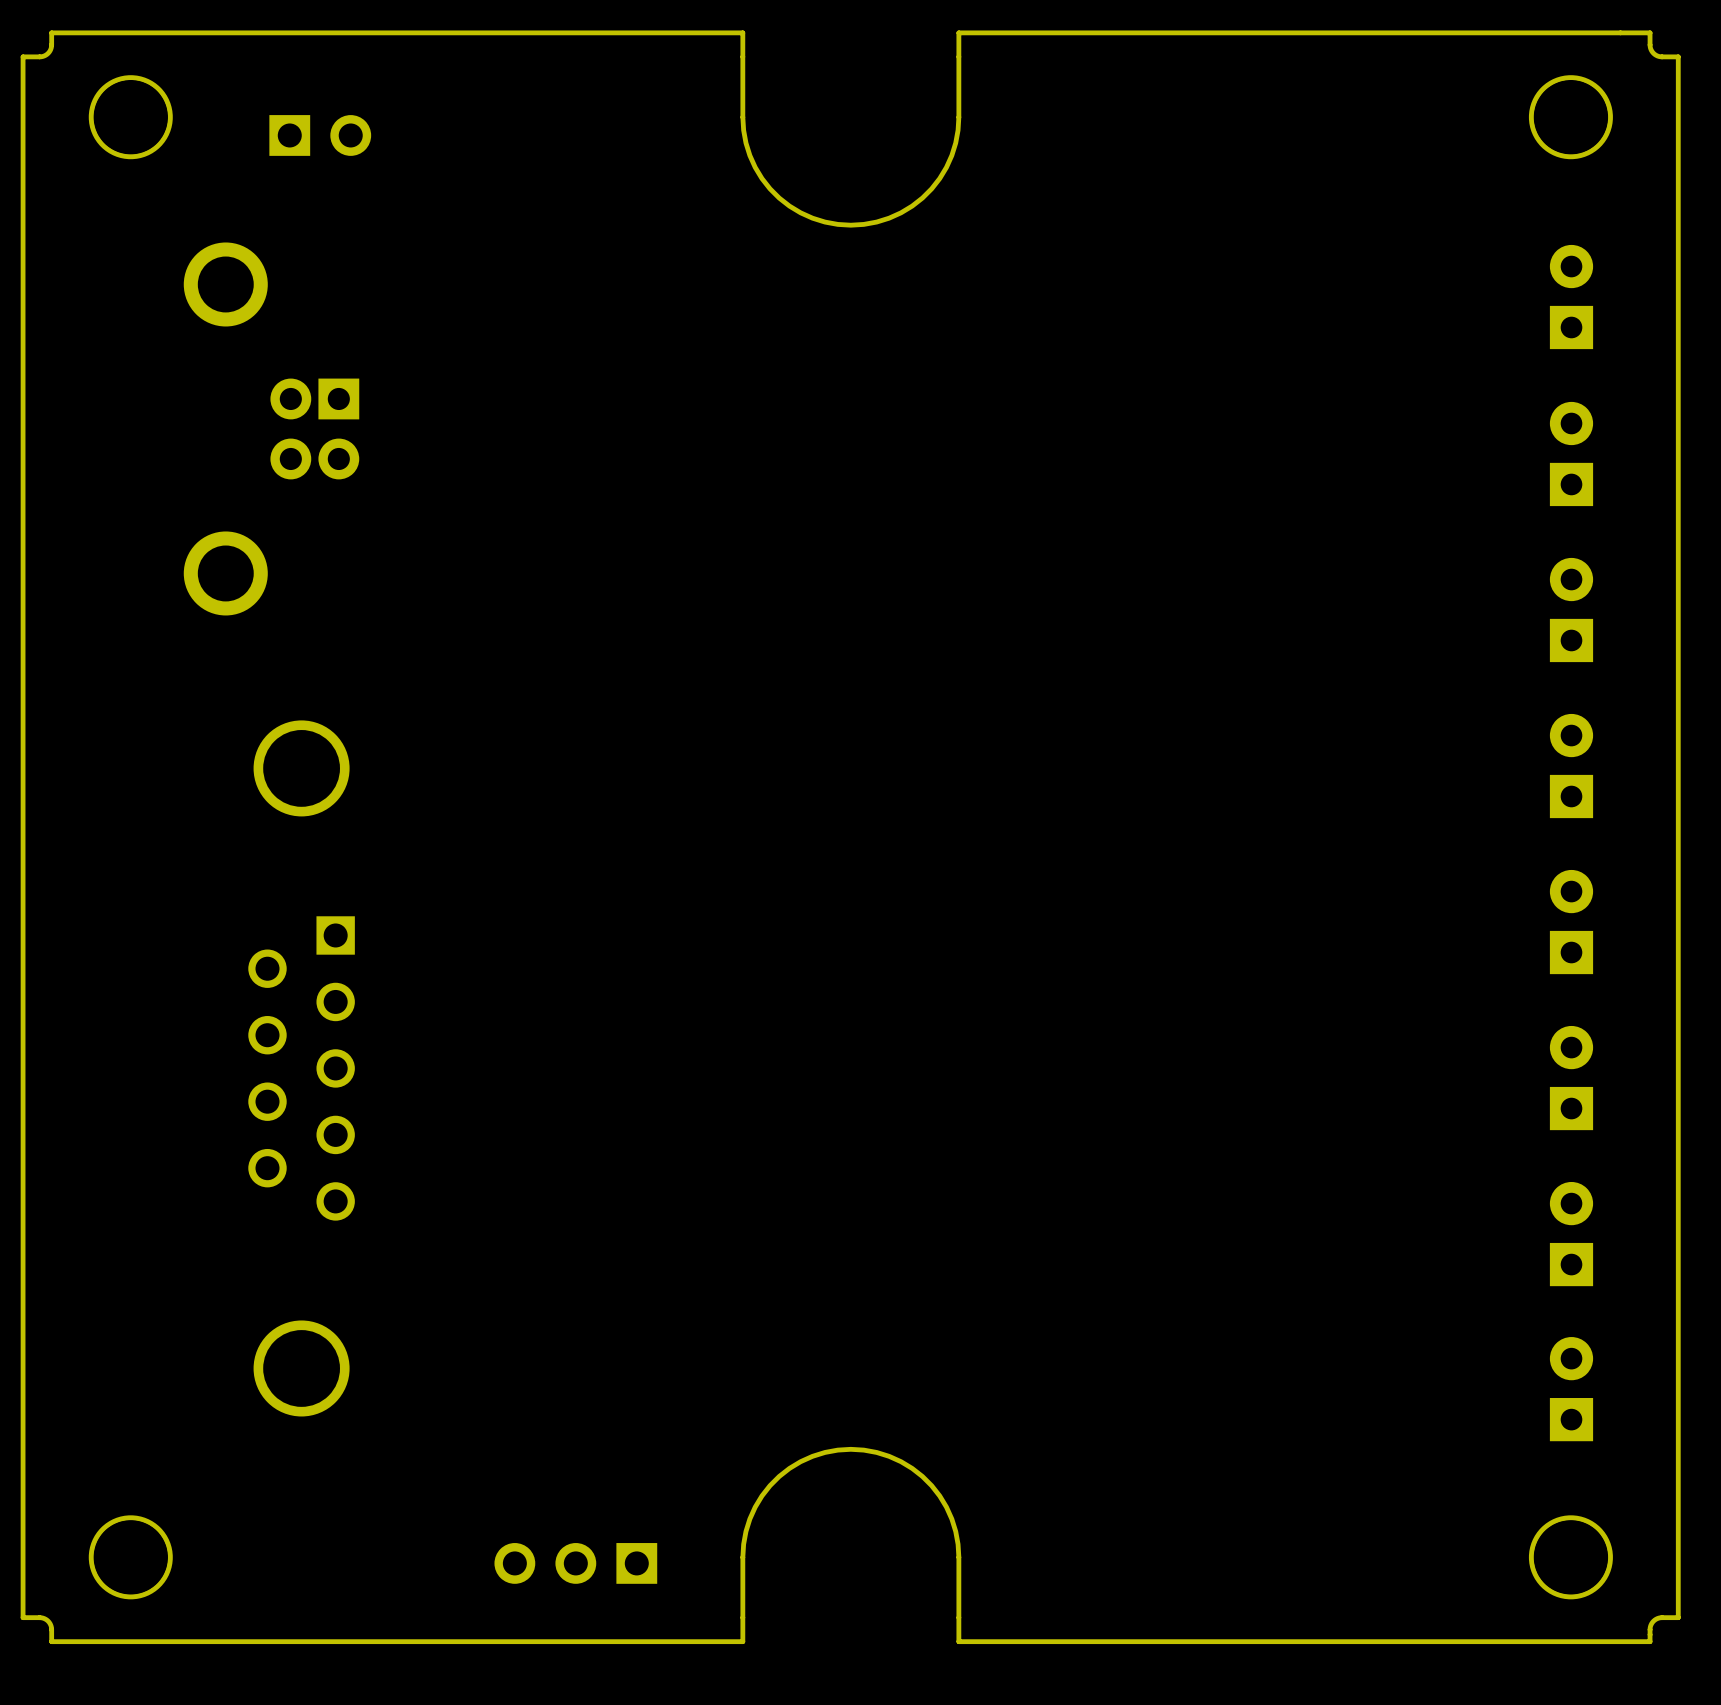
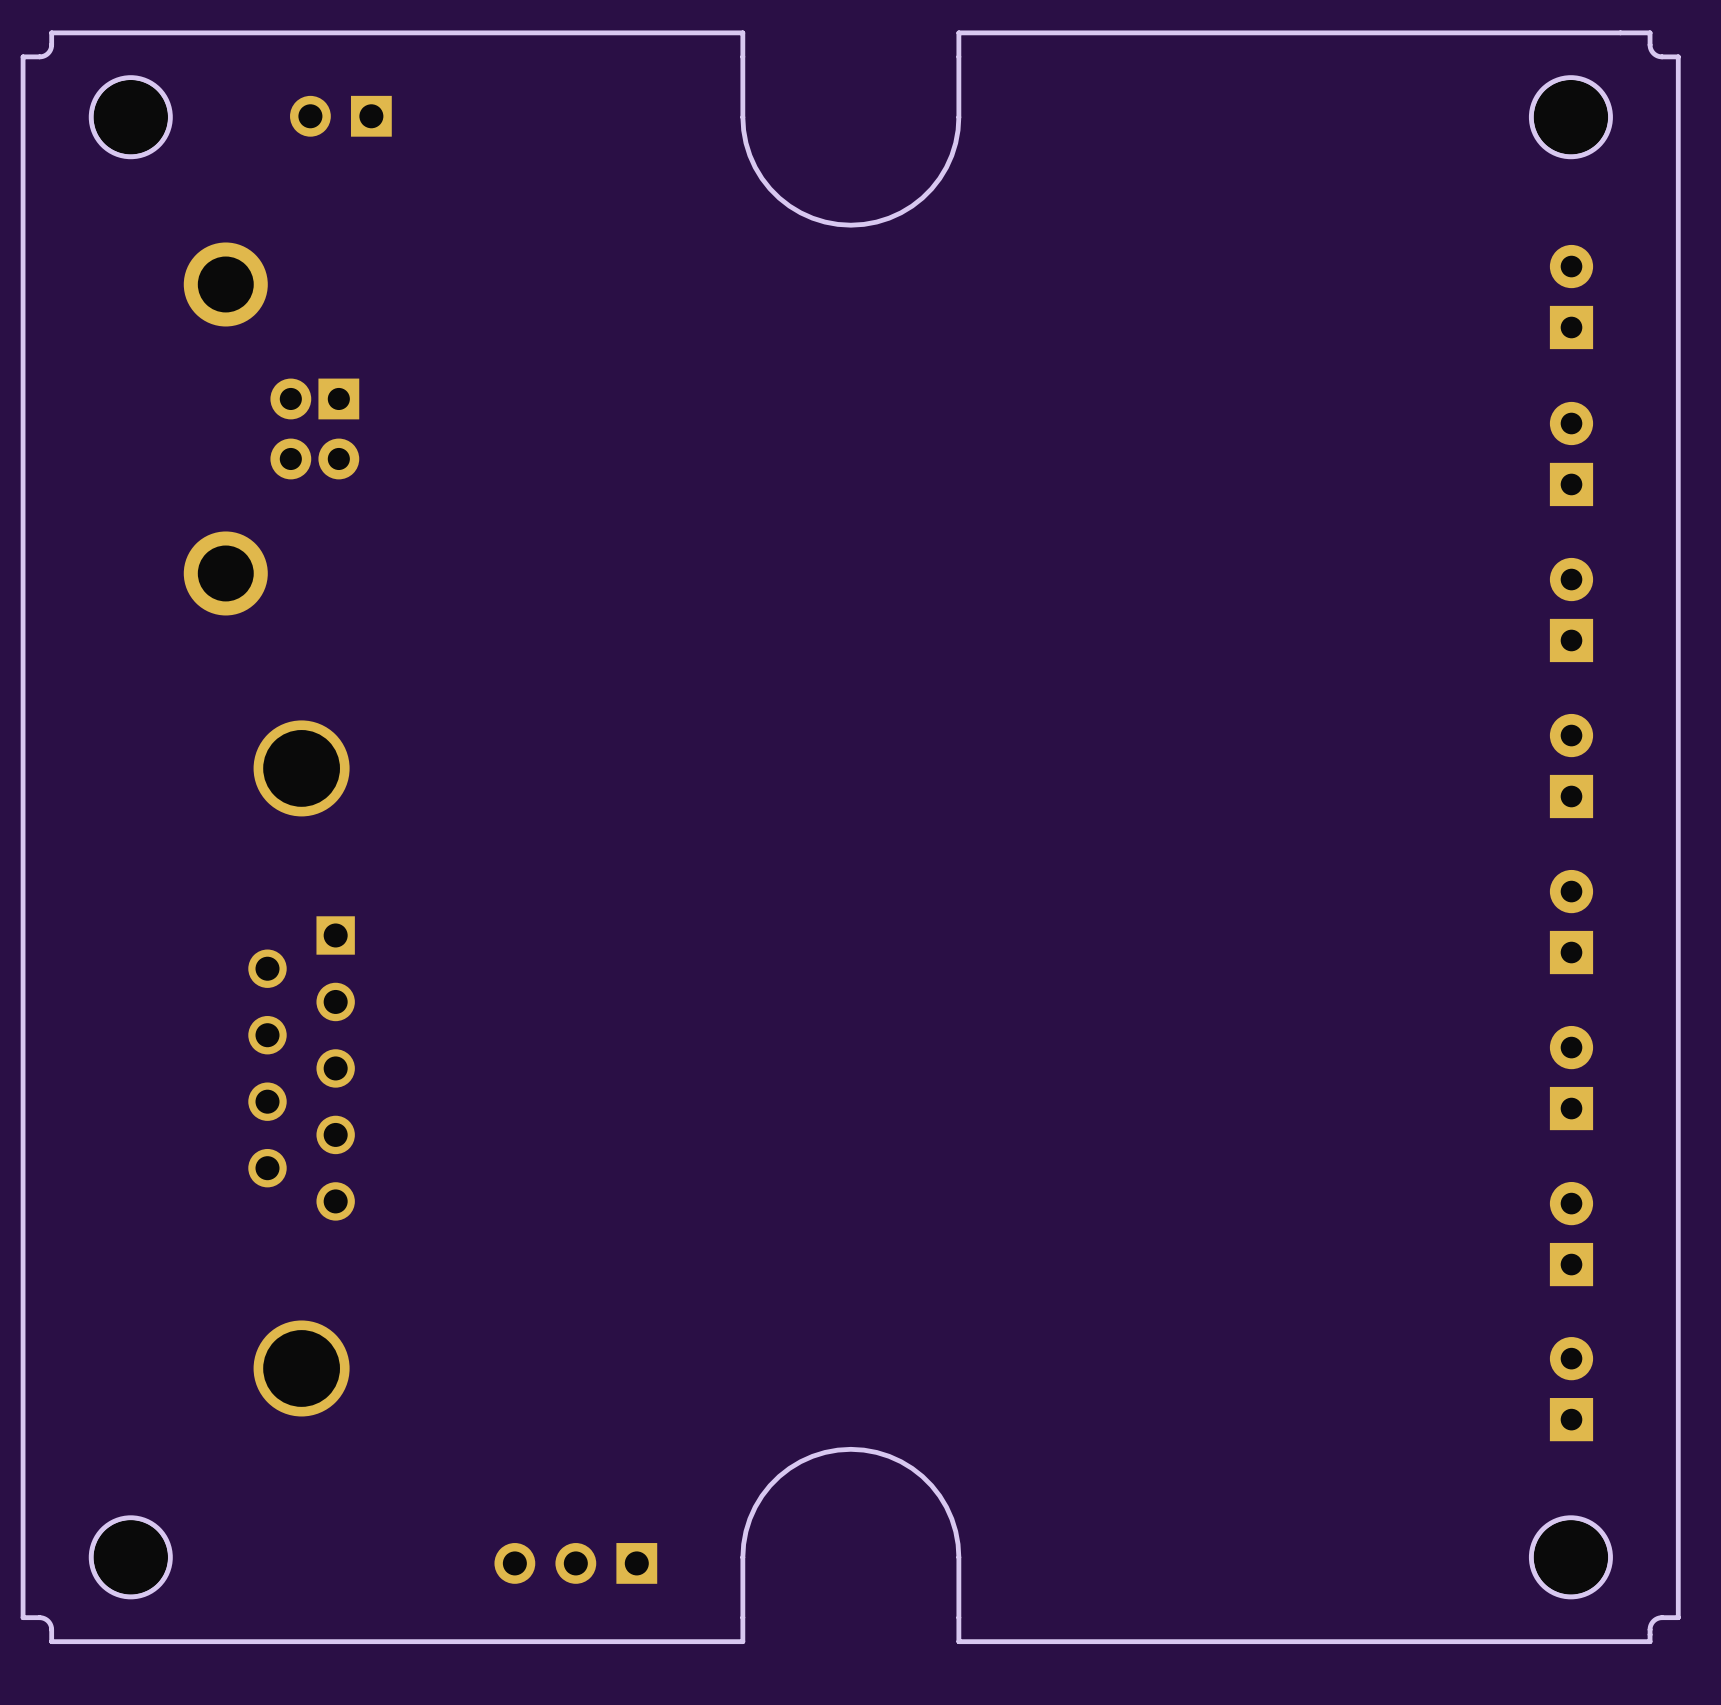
part rotation: 0° (320, 135) -> 180° (340, 116)

